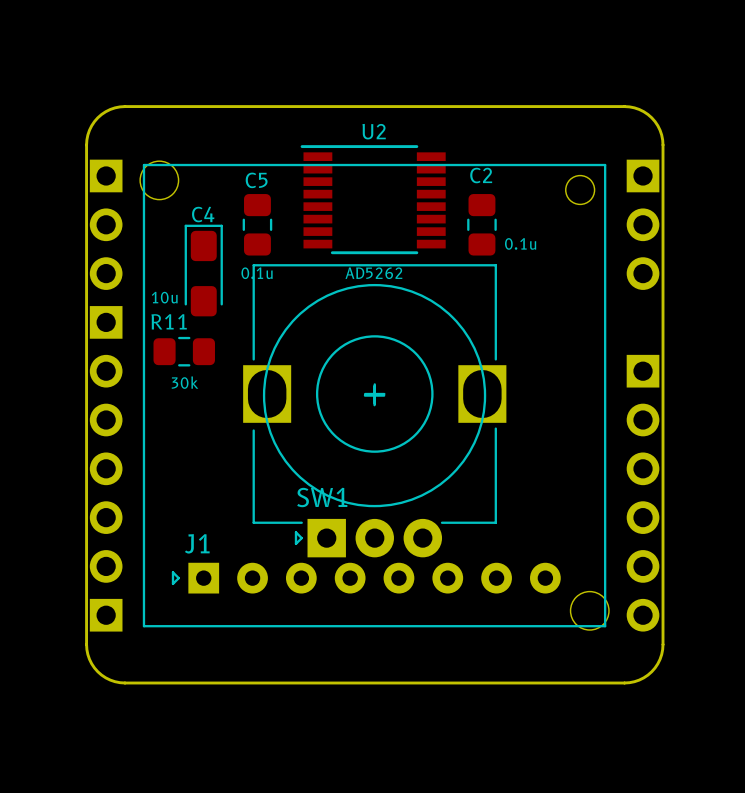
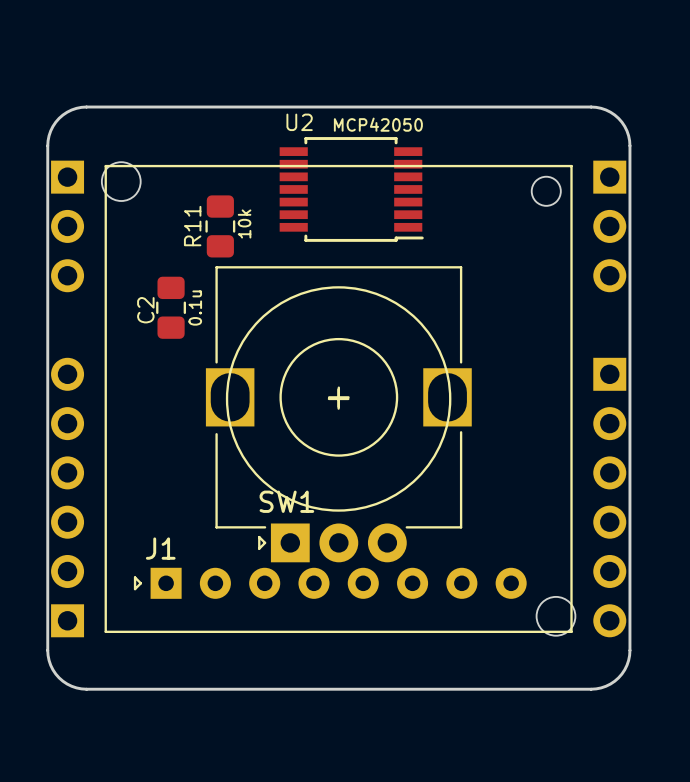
U2 name position: U2 (374, 131) -> U2 (299, 122)
U2 footprint: [300, 145, 446, 255] -> [279, 137, 424, 242]
C2 name rotation: 0° (481, 175) -> 90° counterclockwise (145, 310)
C2 name position: C2 (481, 175) -> C2 (145, 310)
C5 name: C5 (256, 180) -> R11 (192, 226)
C2 position: (481, 224) -> (171, 307)
C2 value rotation: 0° (520, 243) -> 90° counterclockwise (195, 308)
C4: 10u (203, 270) -> none
C5 value: 0.1u (257, 273) -> 10k (244, 223)
U2 value: AD5262 (373, 273) -> MCP42050 (378, 124)
part: (106, 322) -> none
R11: 30k (184, 351) -> none

